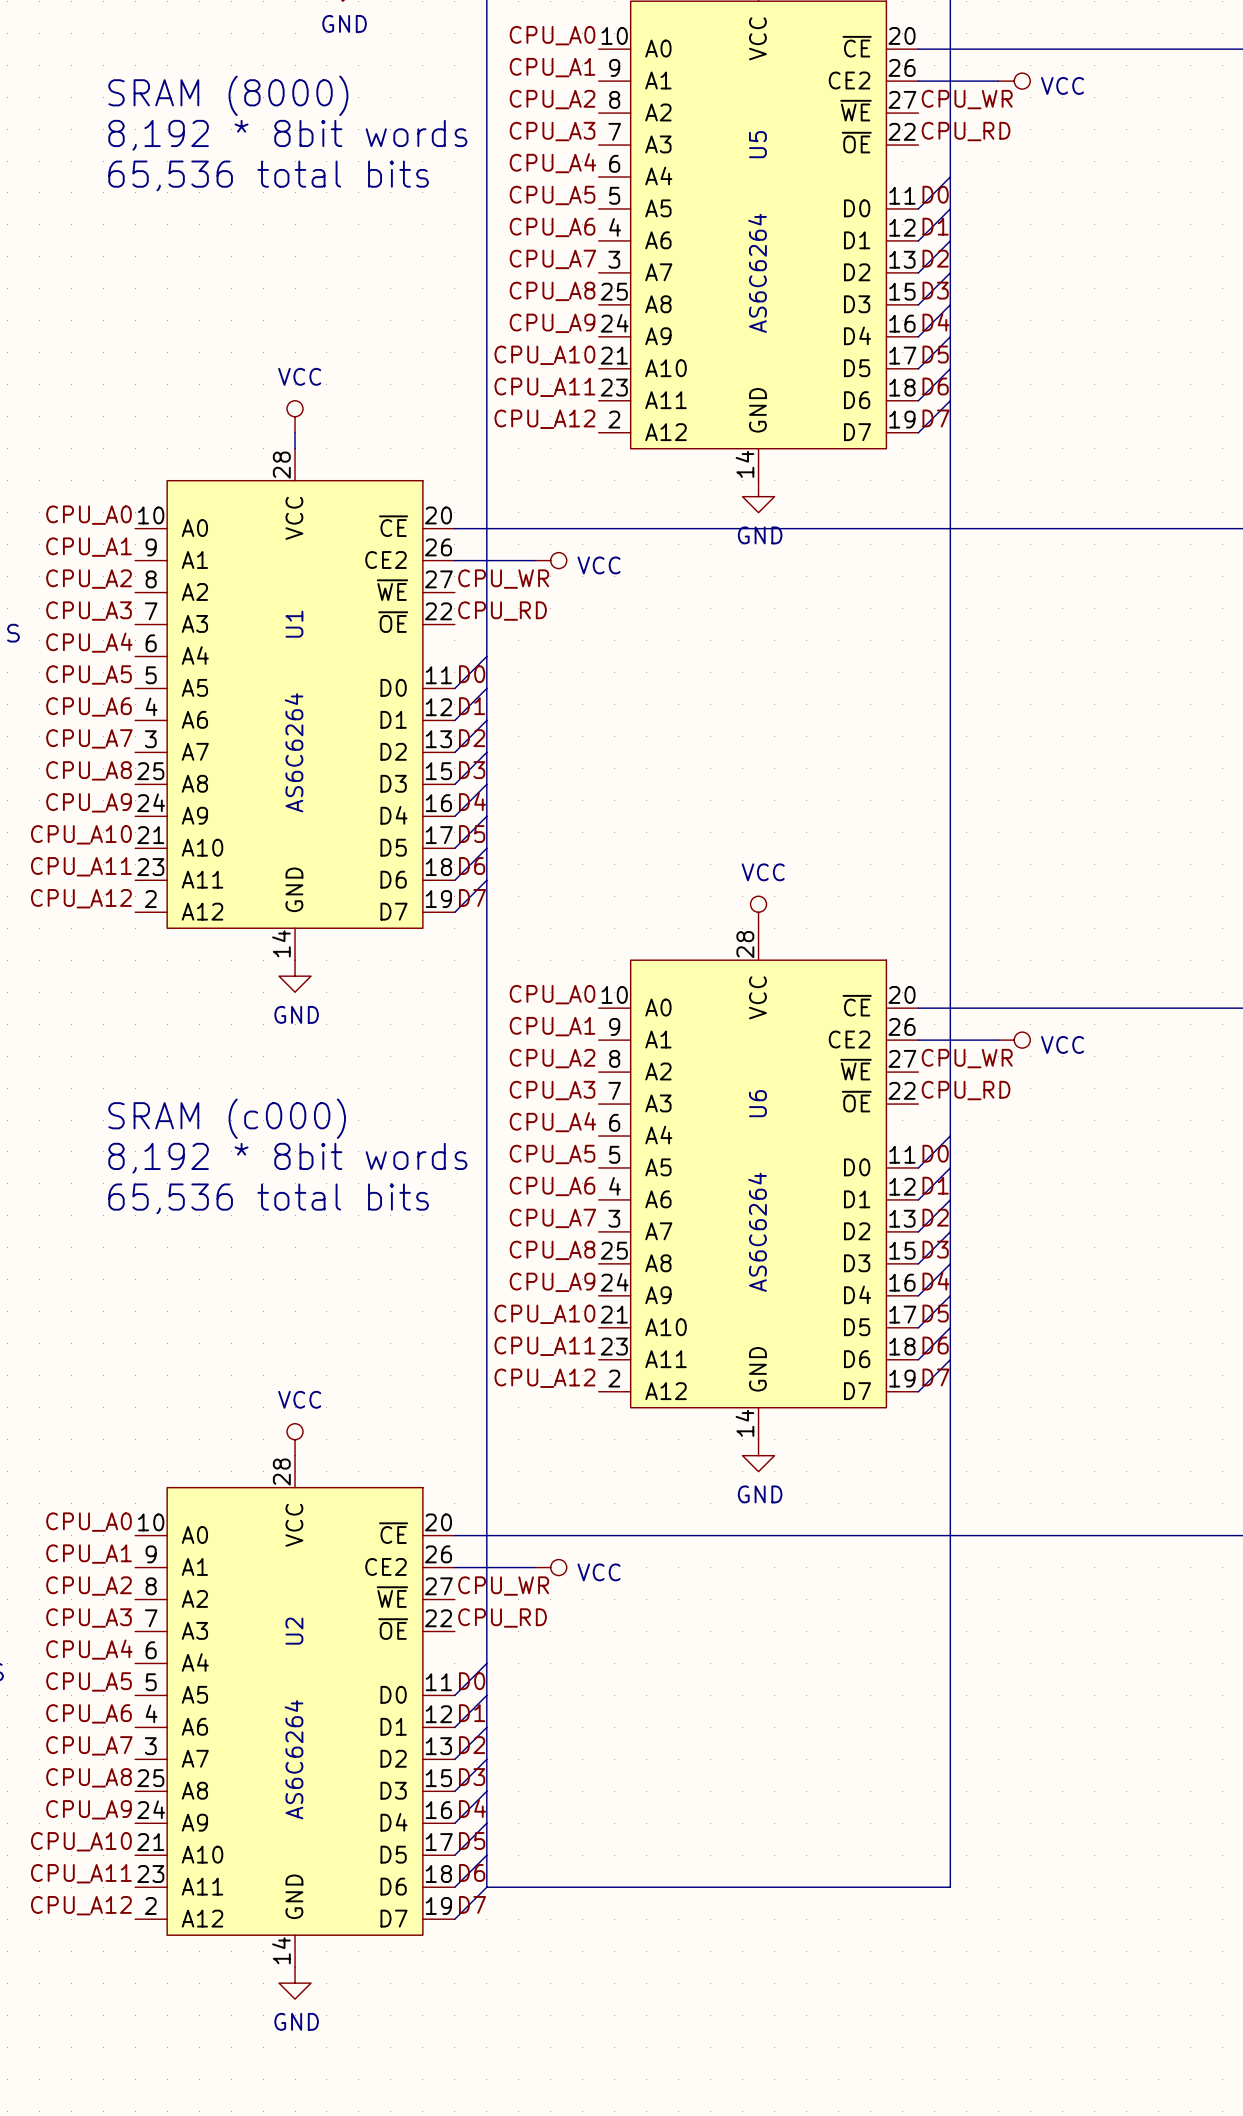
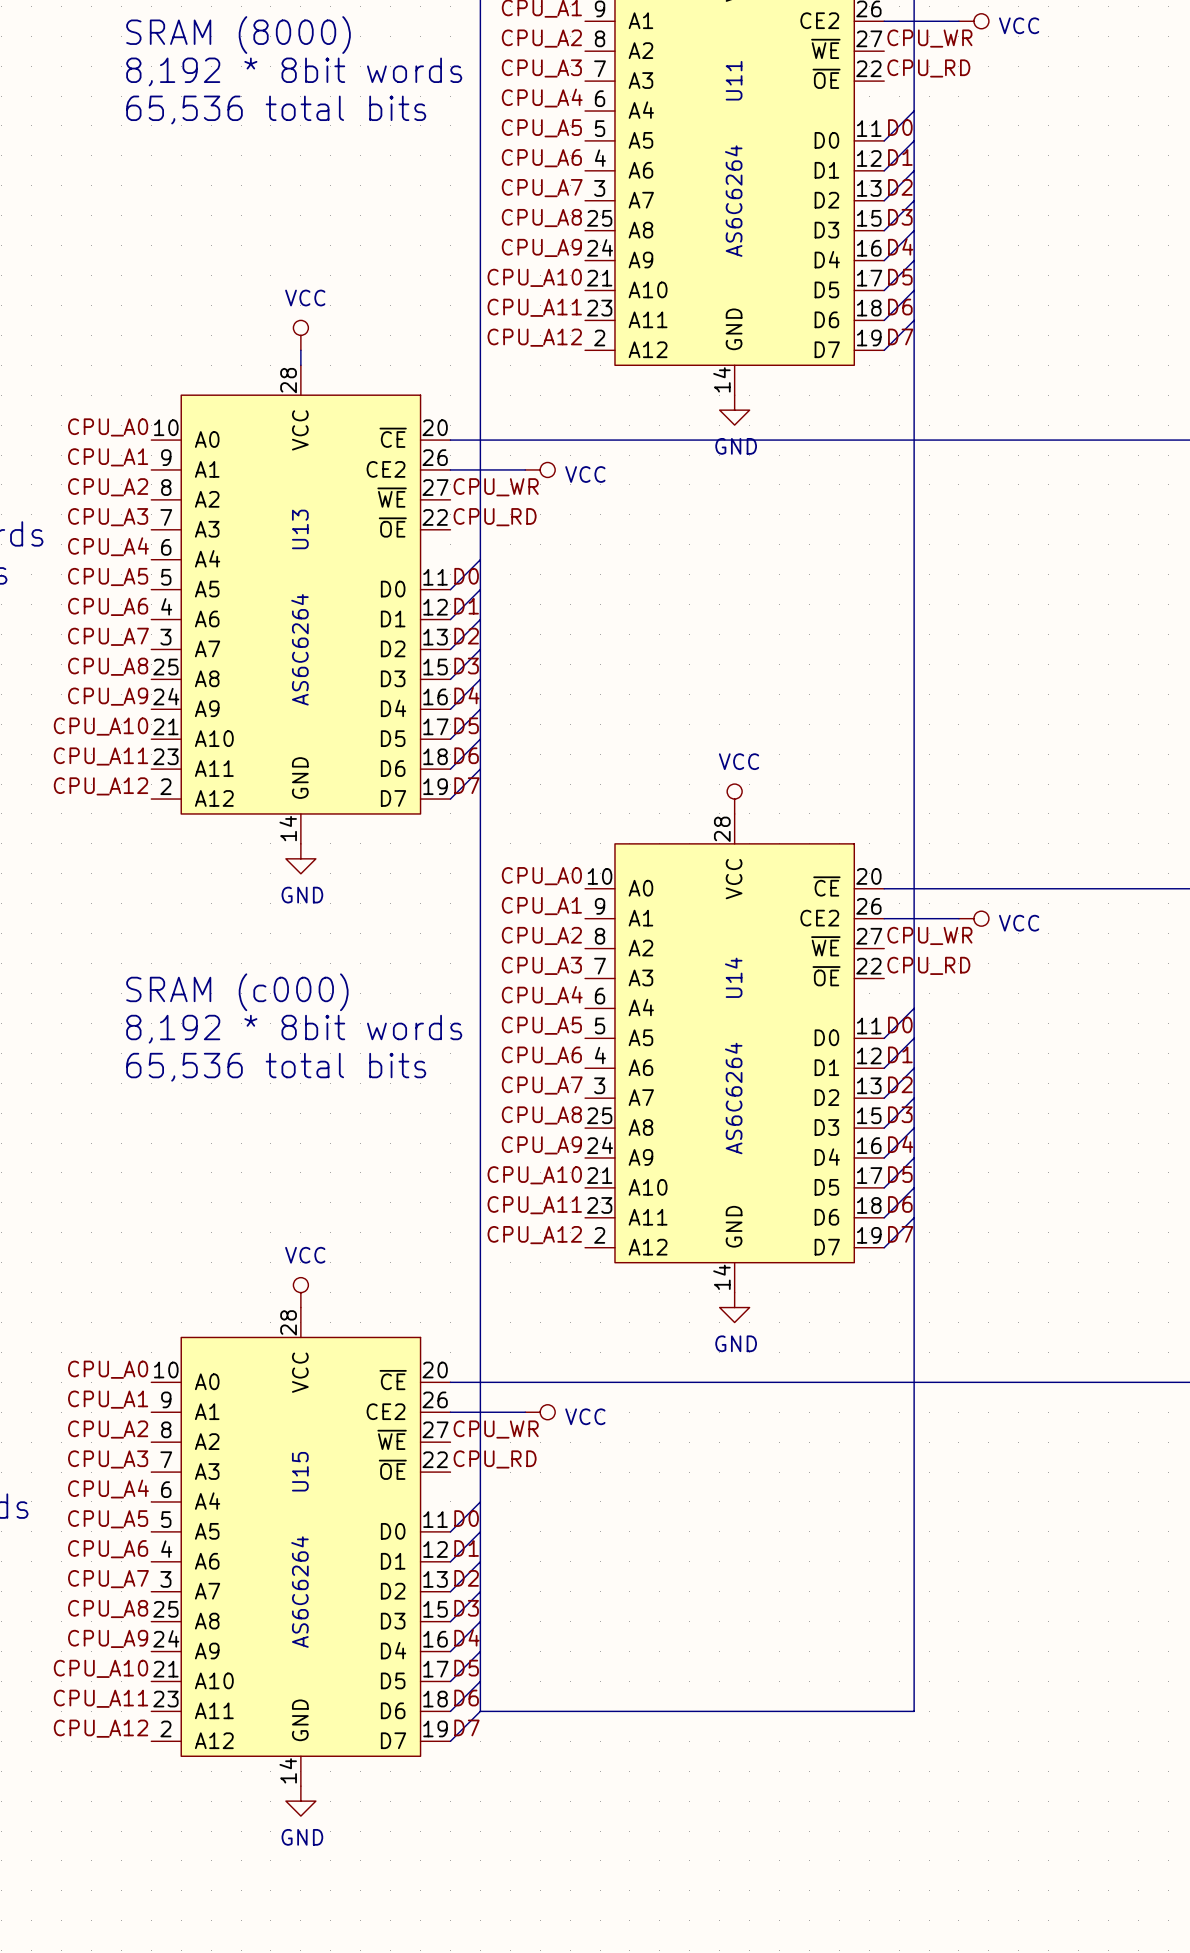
U5 name: U5 (757, 144) -> U11 (734, 80)
U1 name: U1 (294, 624) -> U13 (300, 529)
U6 name: U6 (757, 1103) -> U14 (733, 977)
U2 name: U2 (294, 1631) -> U15 (300, 1471)

